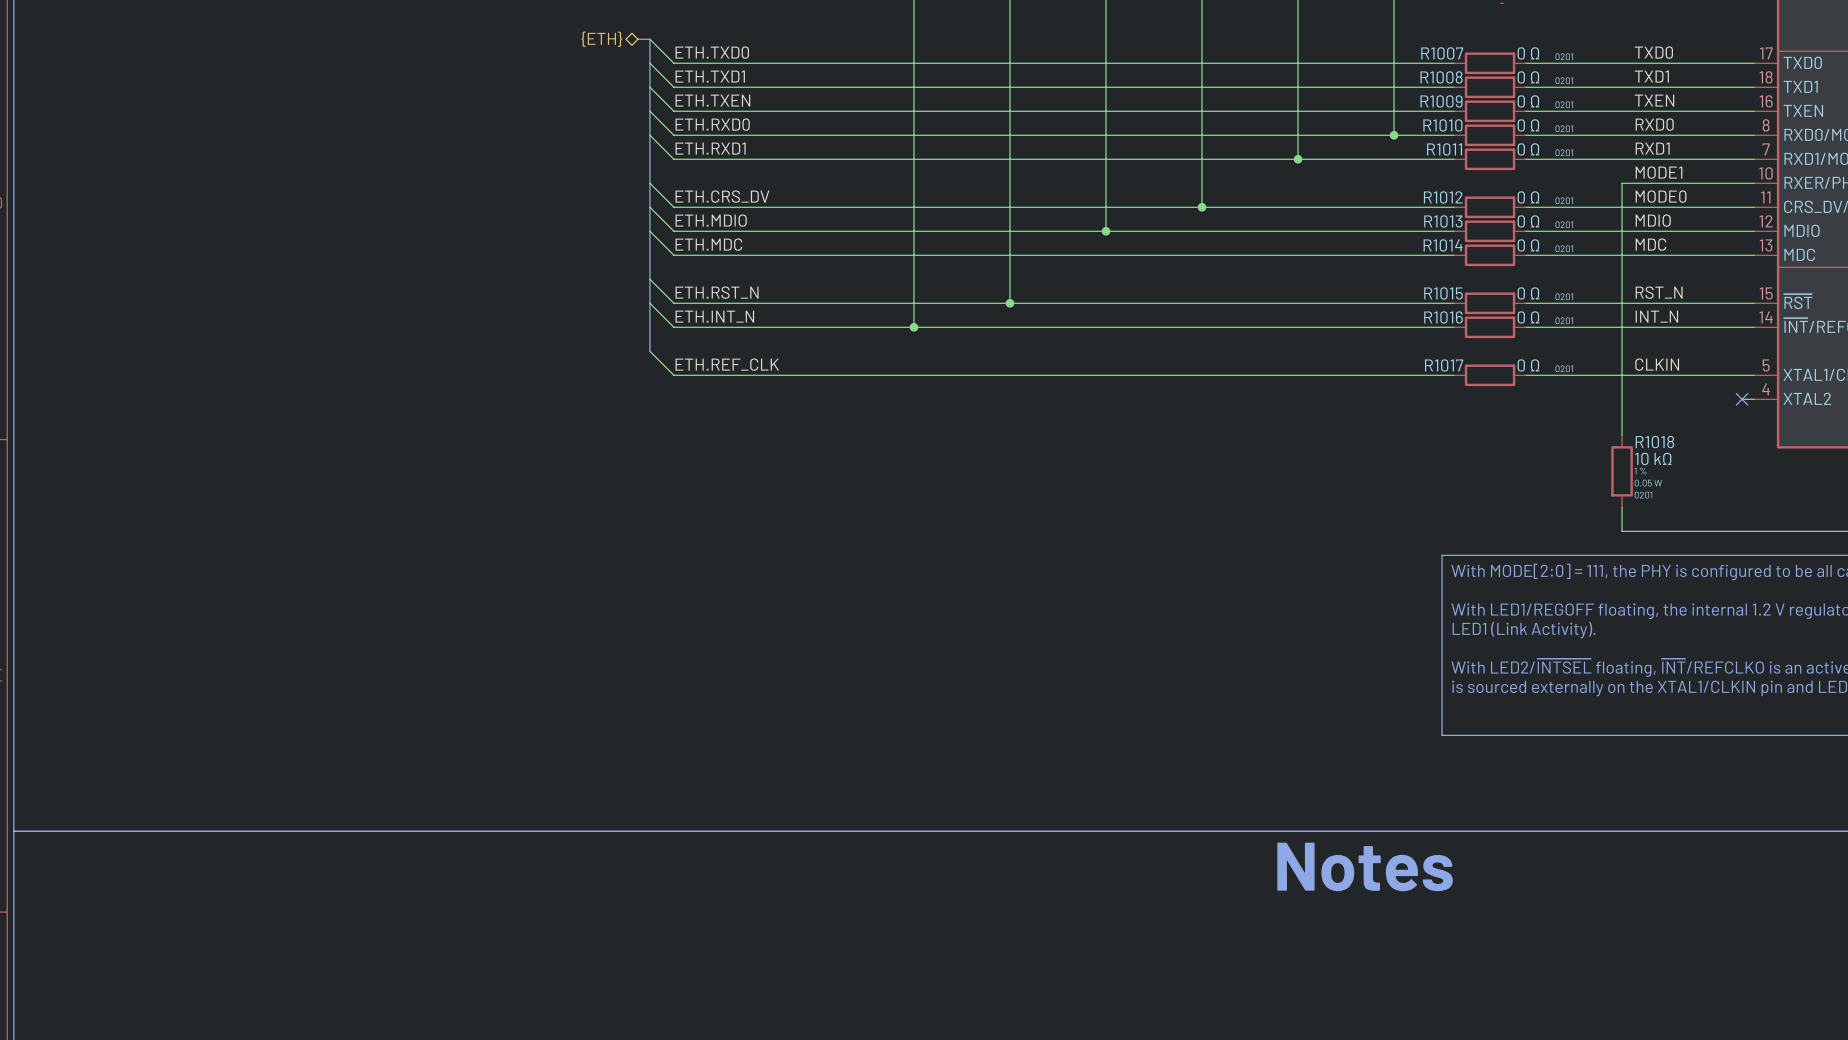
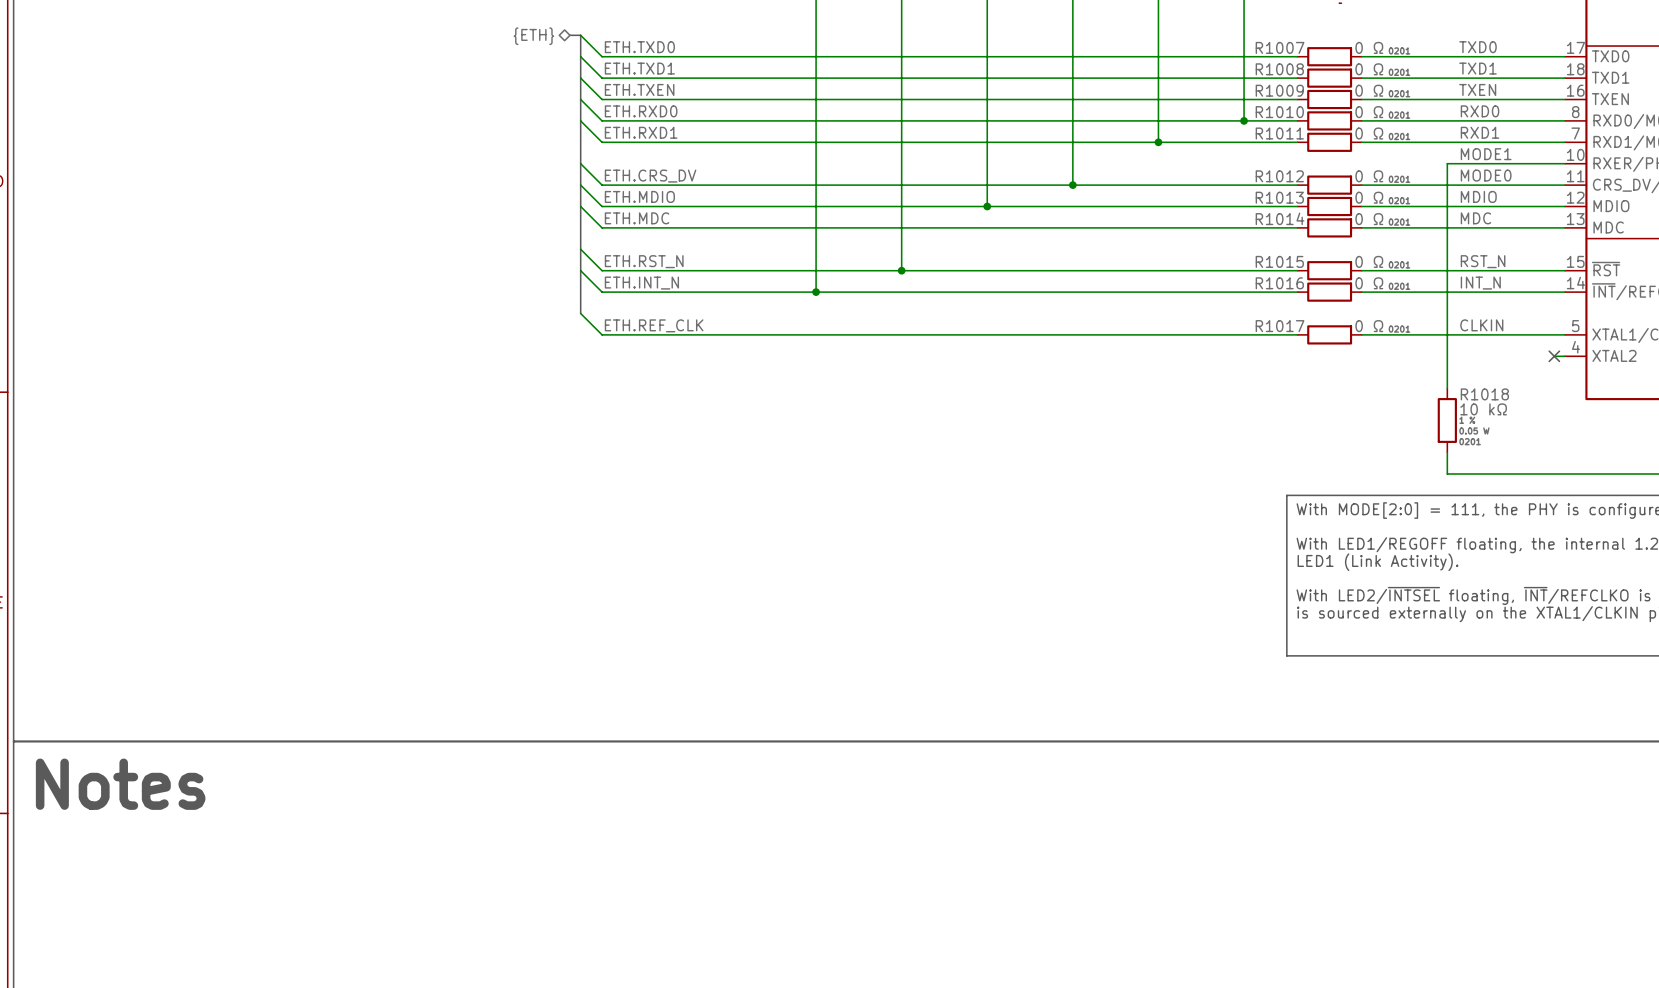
text: Notes (1365, 866) -> none
text: none -> Notes (120, 784)

